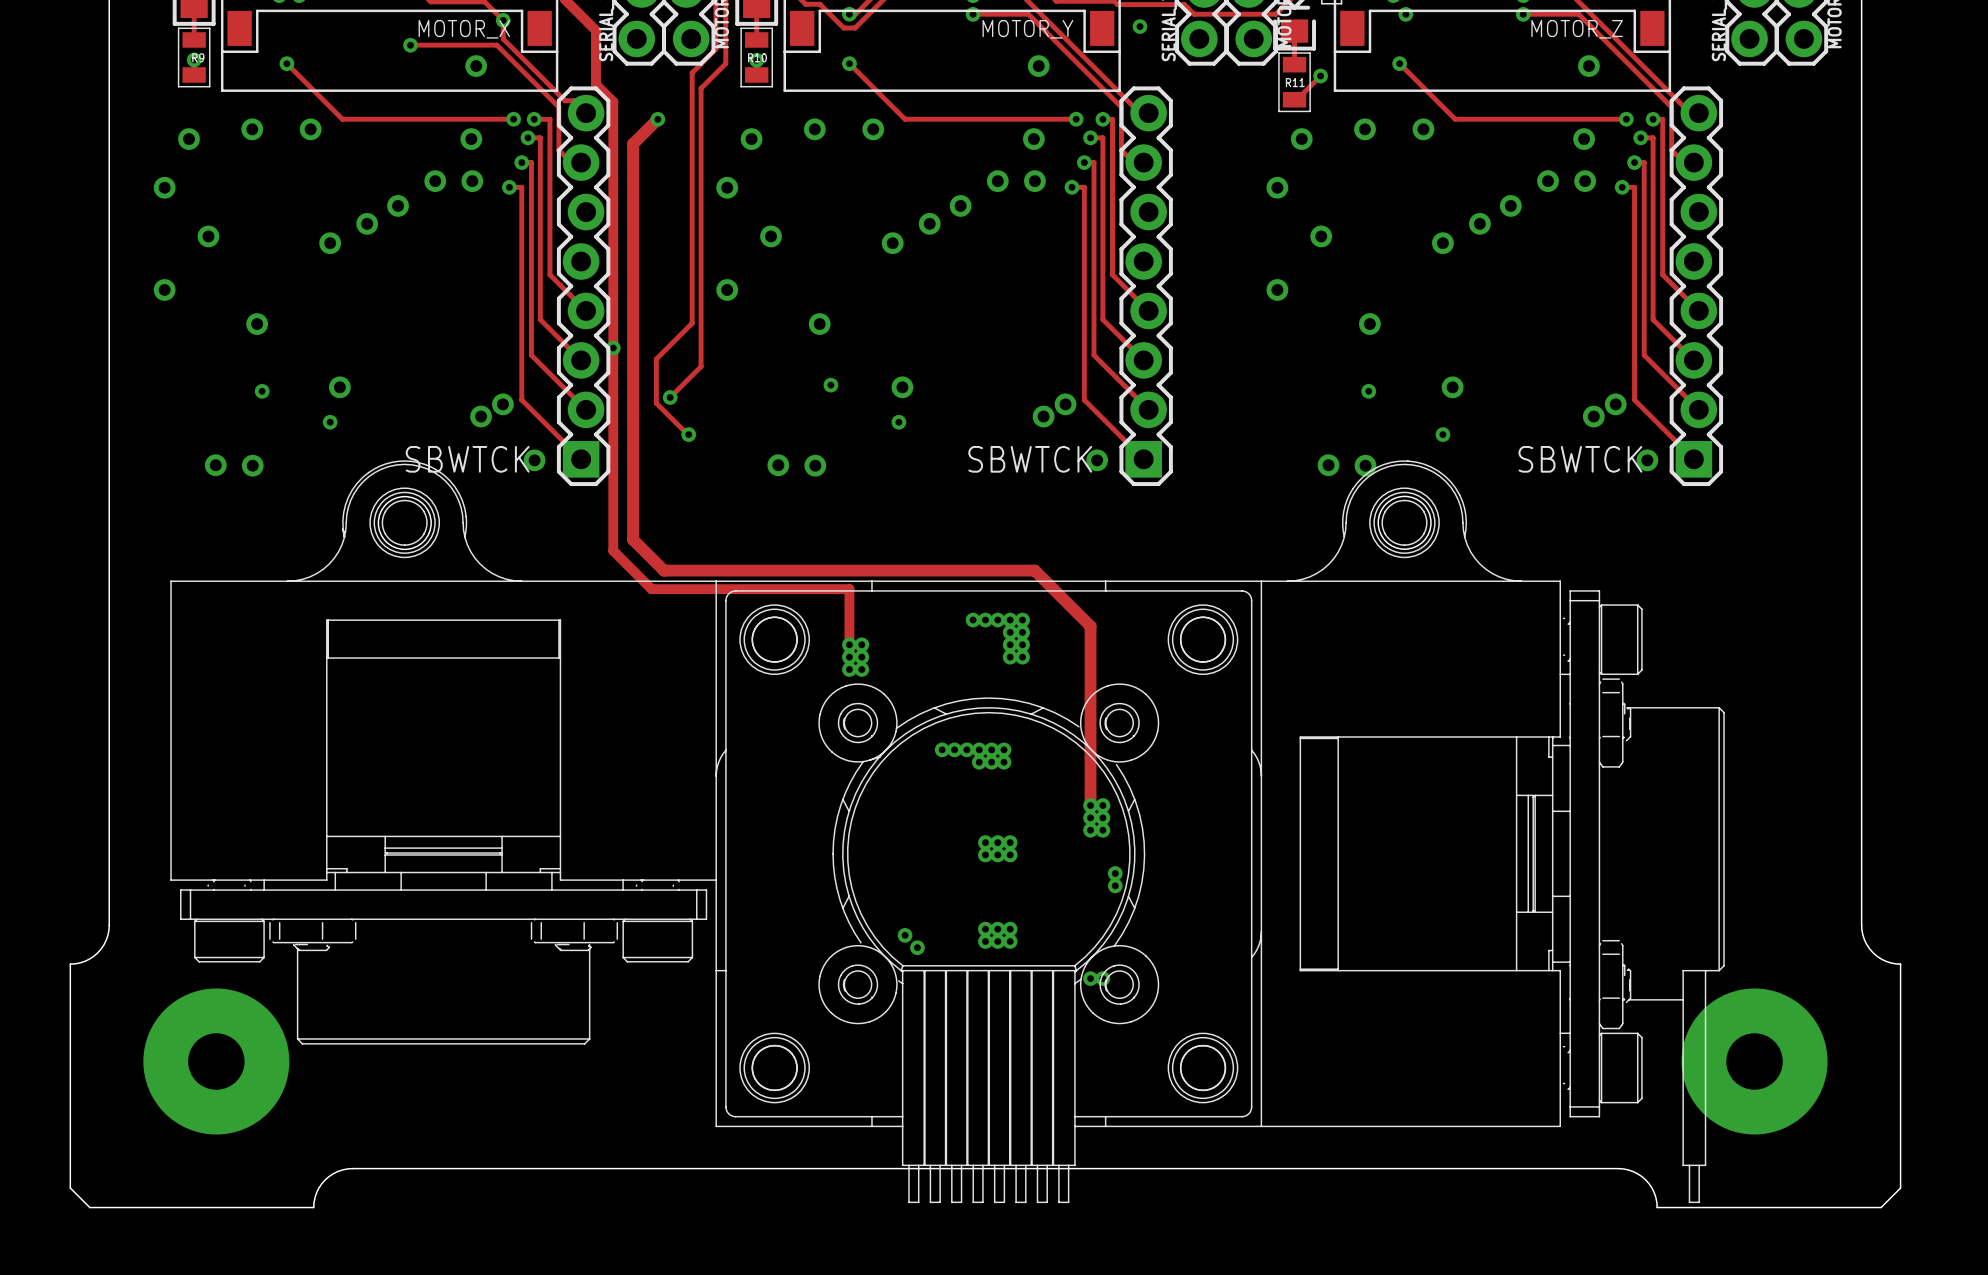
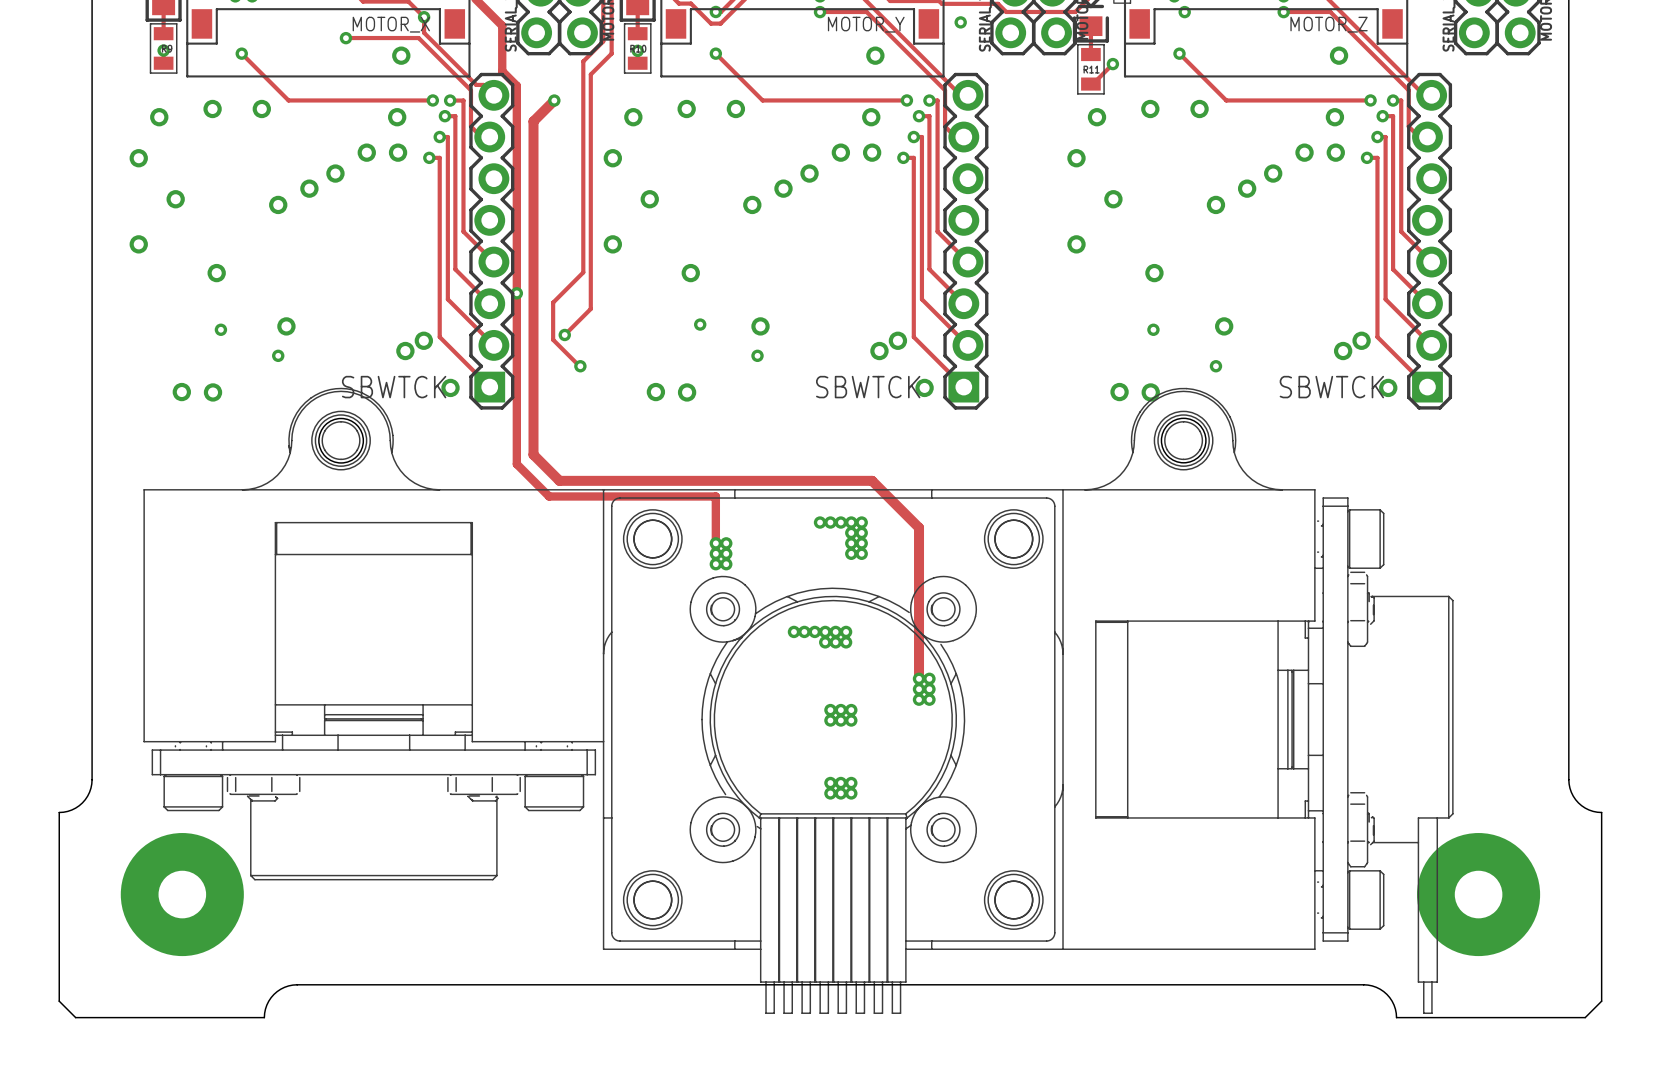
via: (1115, 873) -> none
via: (1115, 885) -> none
via: (905, 935) -> none
via: (917, 947) -> none
via: (1090, 978) -> none
via: (1102, 978) -> none

